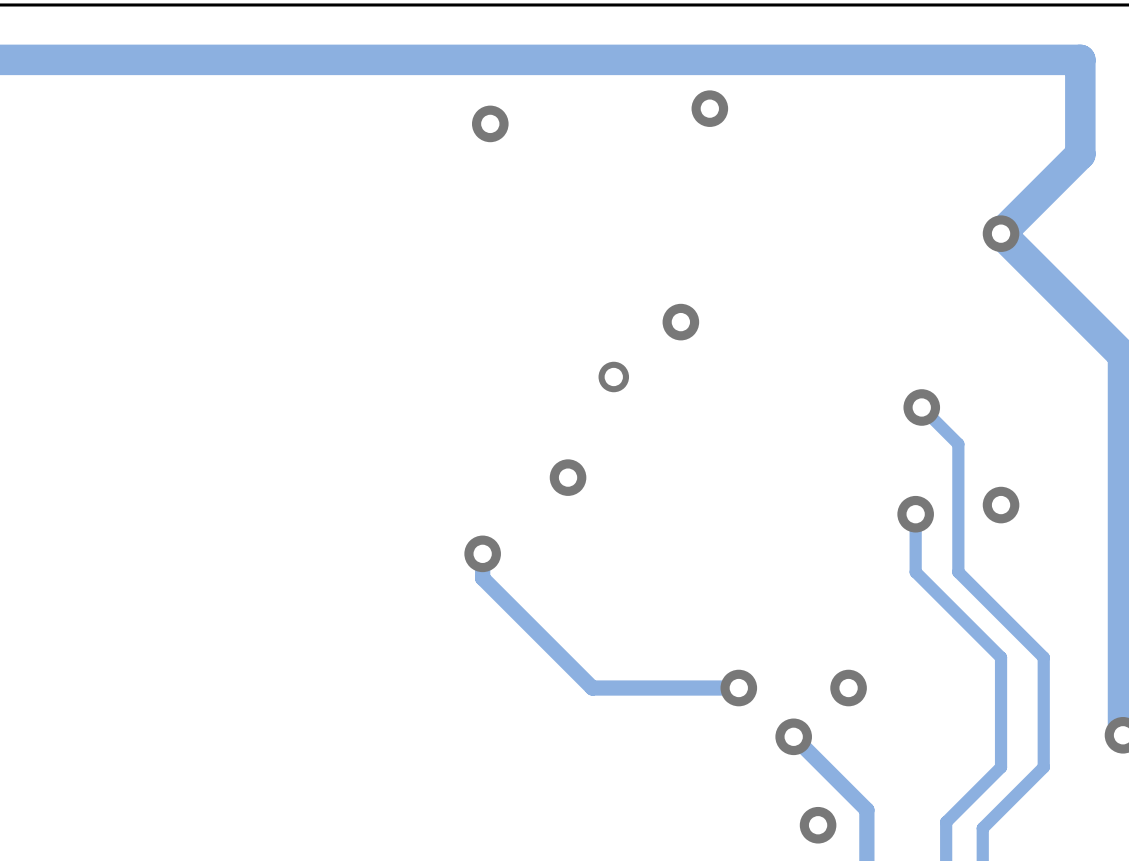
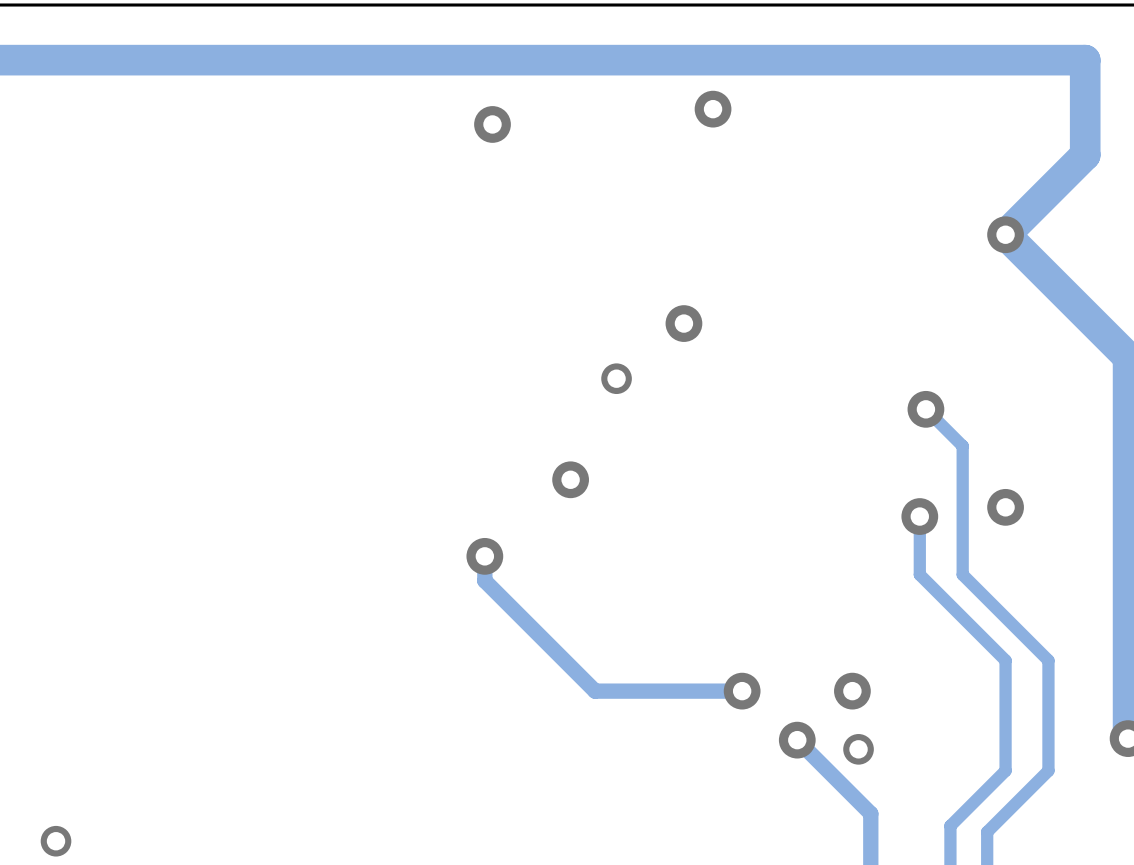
via: none -> (858, 749)
via: (818, 825) -> none
via: none -> (56, 841)

